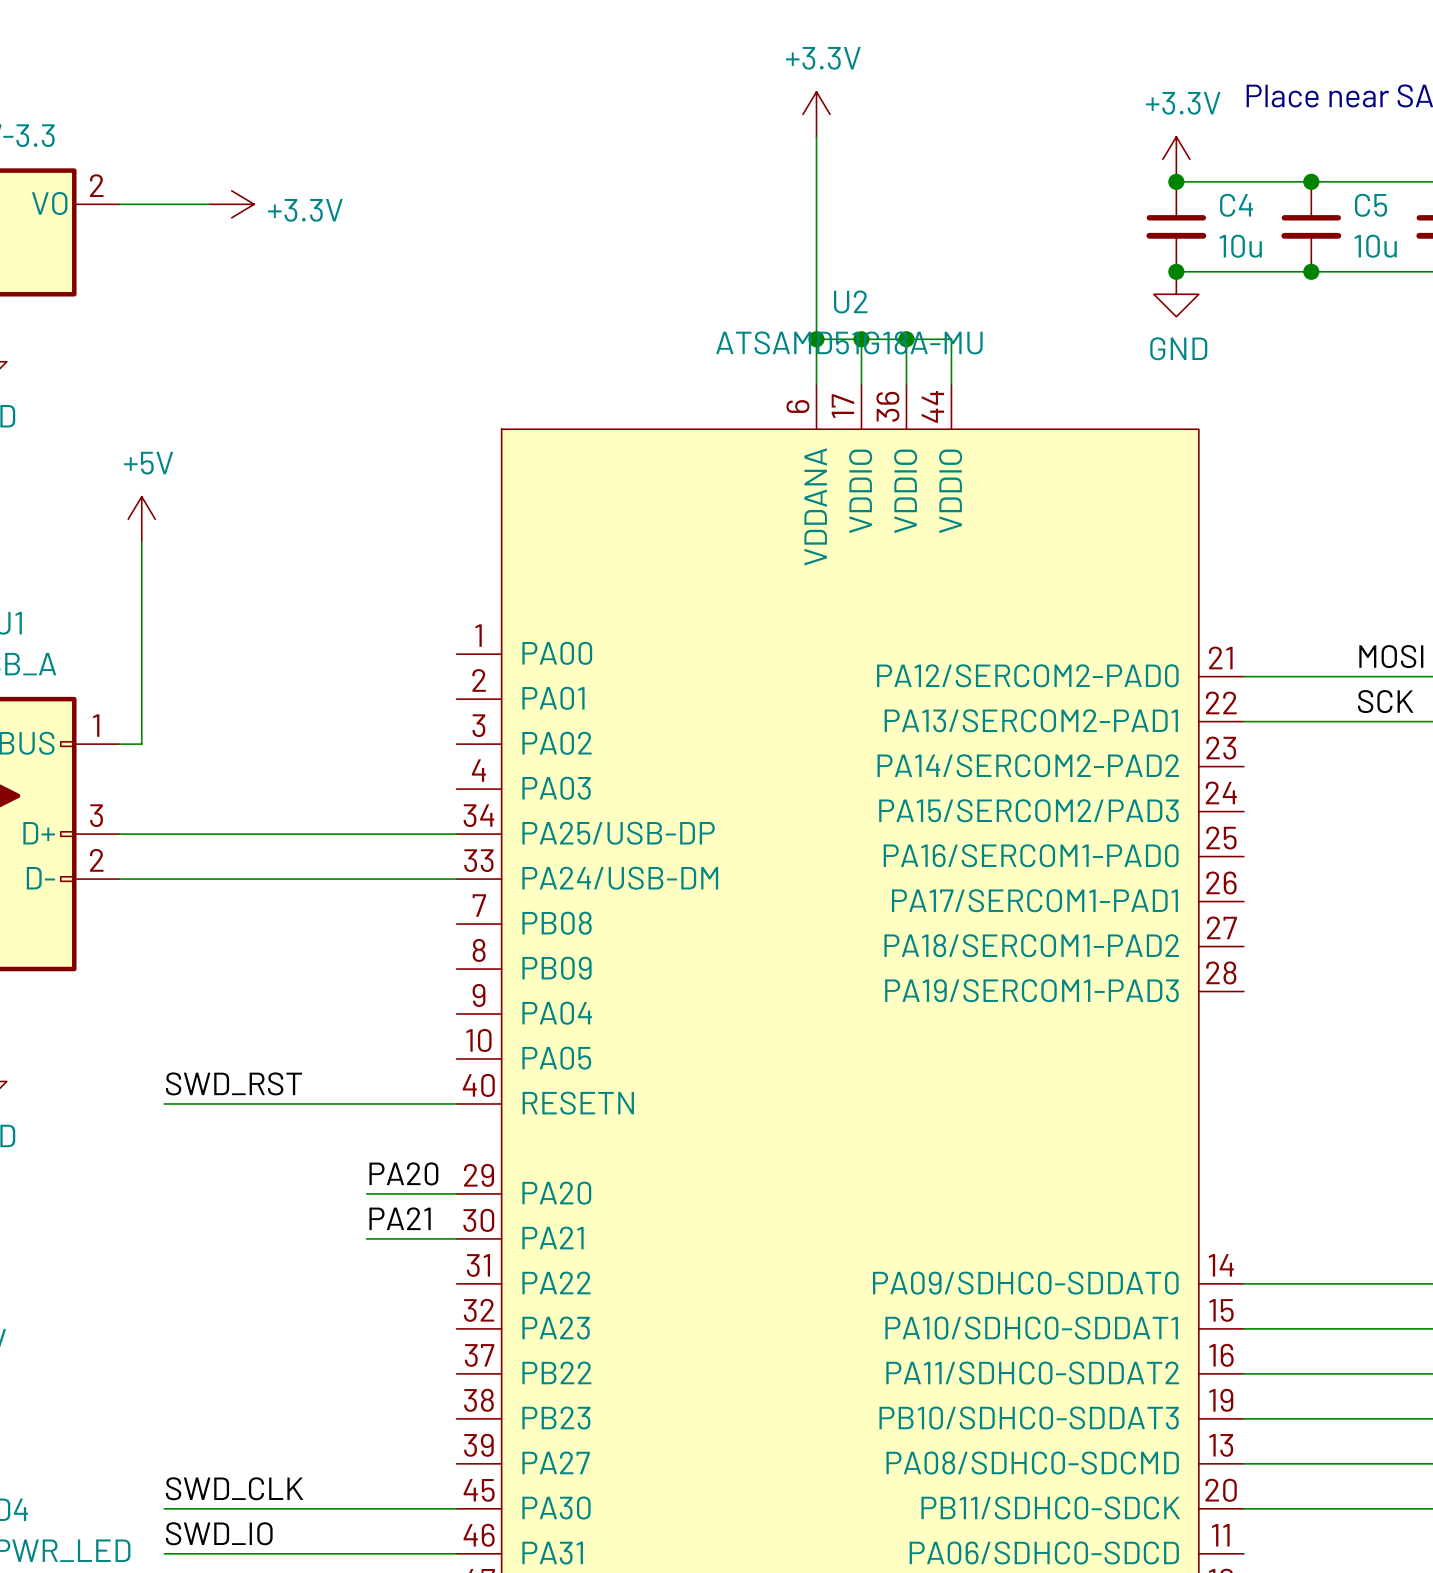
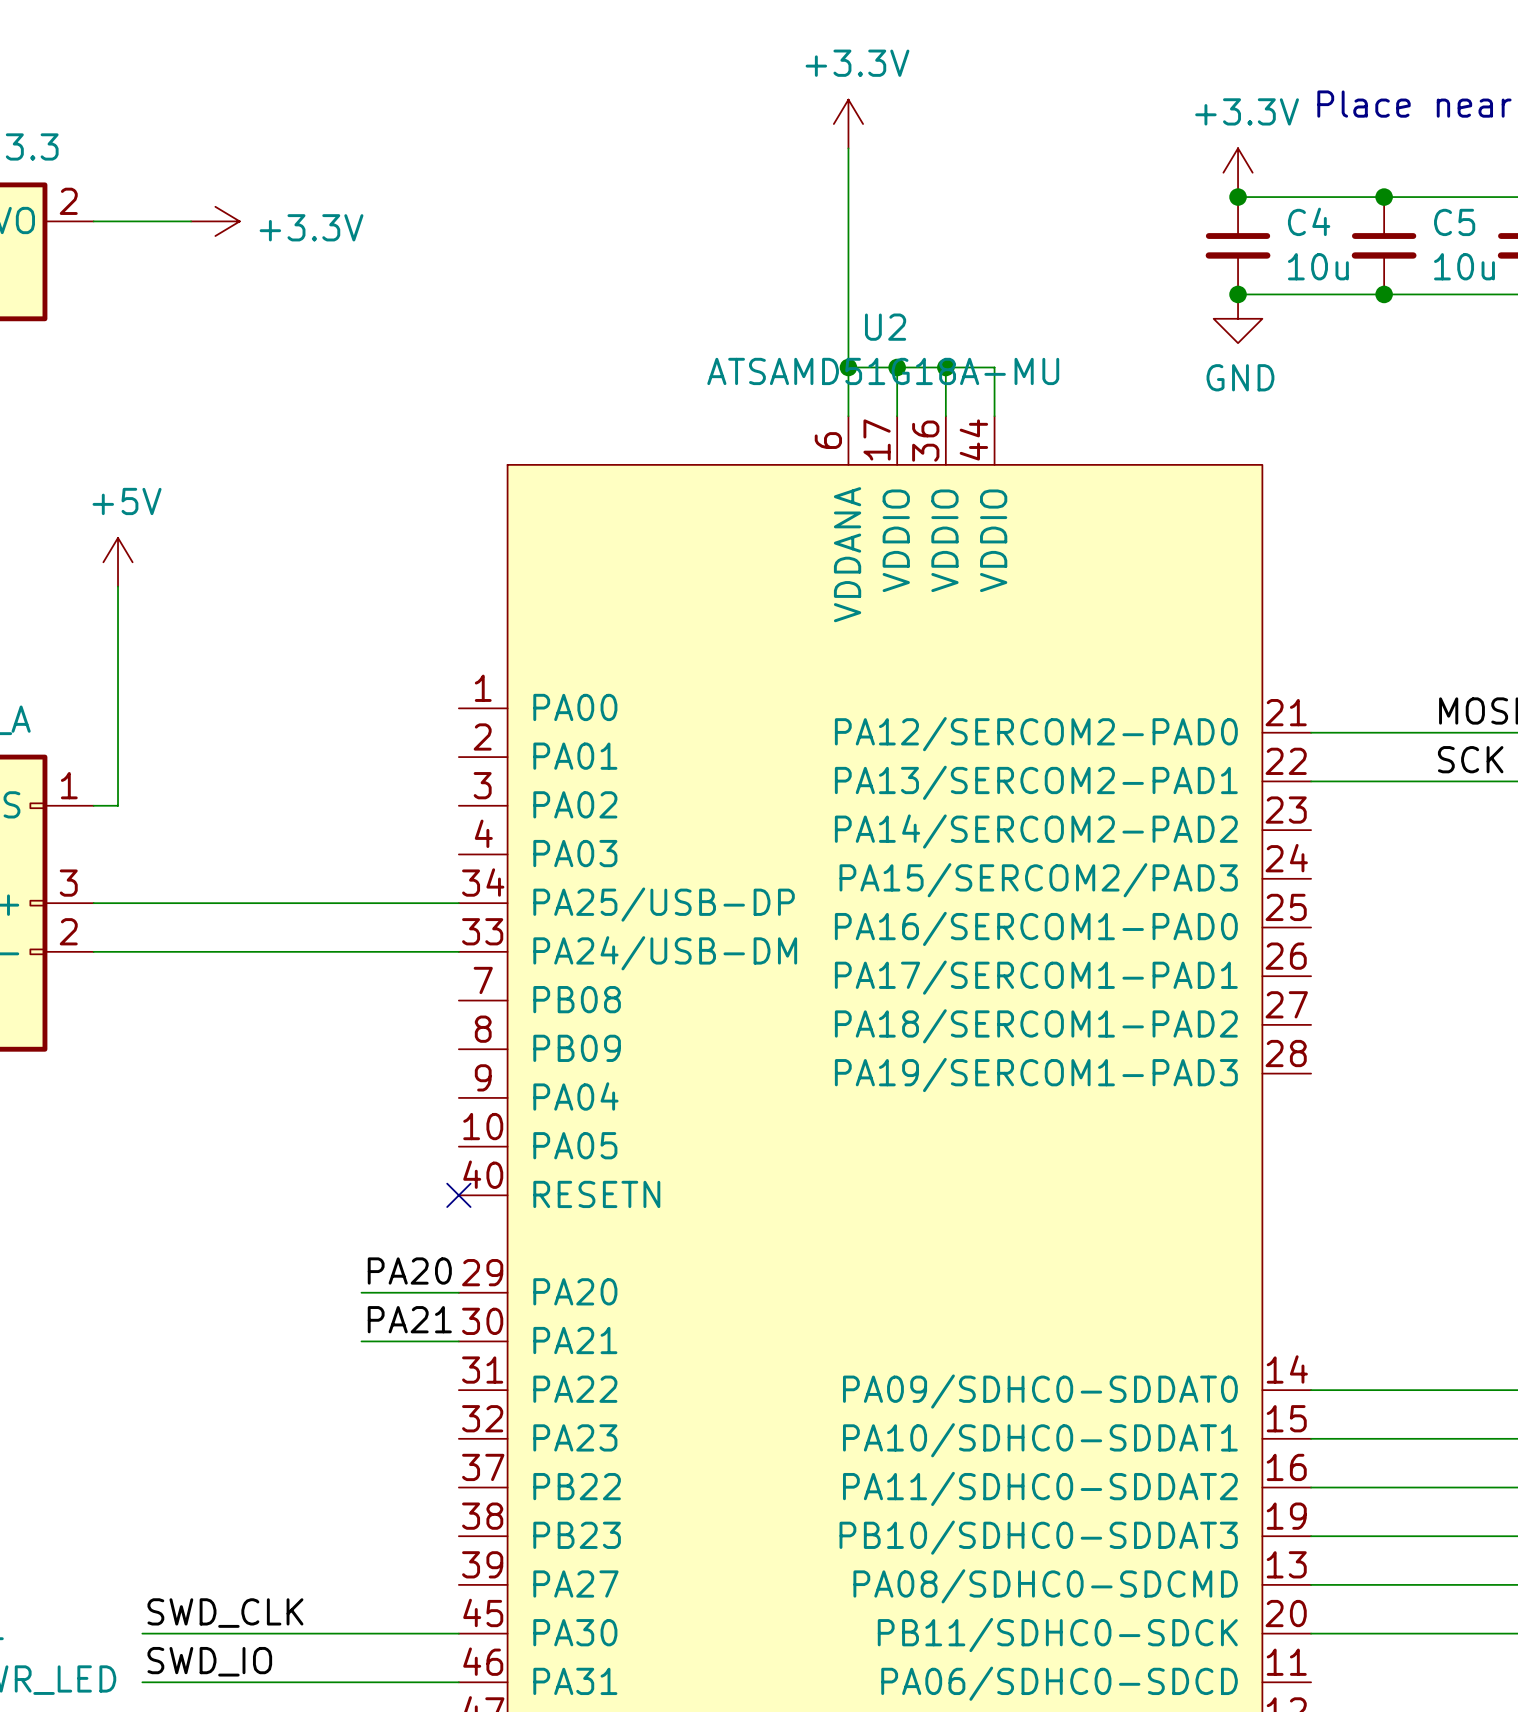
label: SWD_RST (233, 1083) -> none
wire: (164, 1103) (456, 1103) -> none
no-connect mark: none -> (458, 1195)

